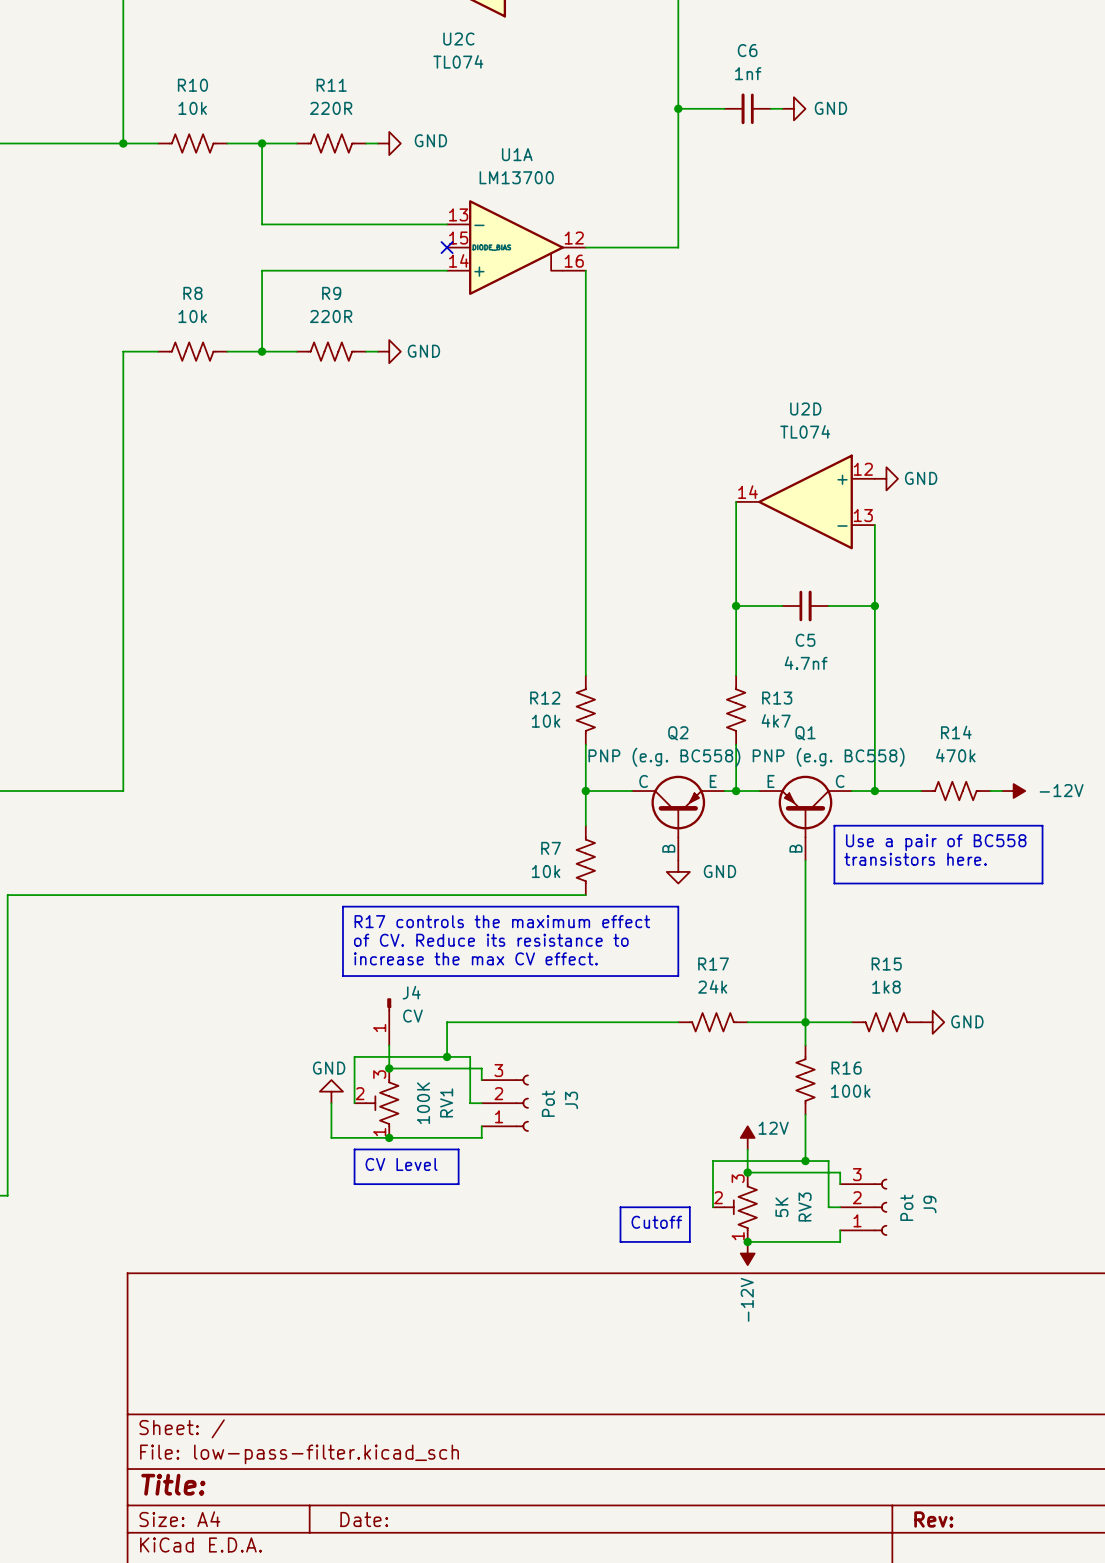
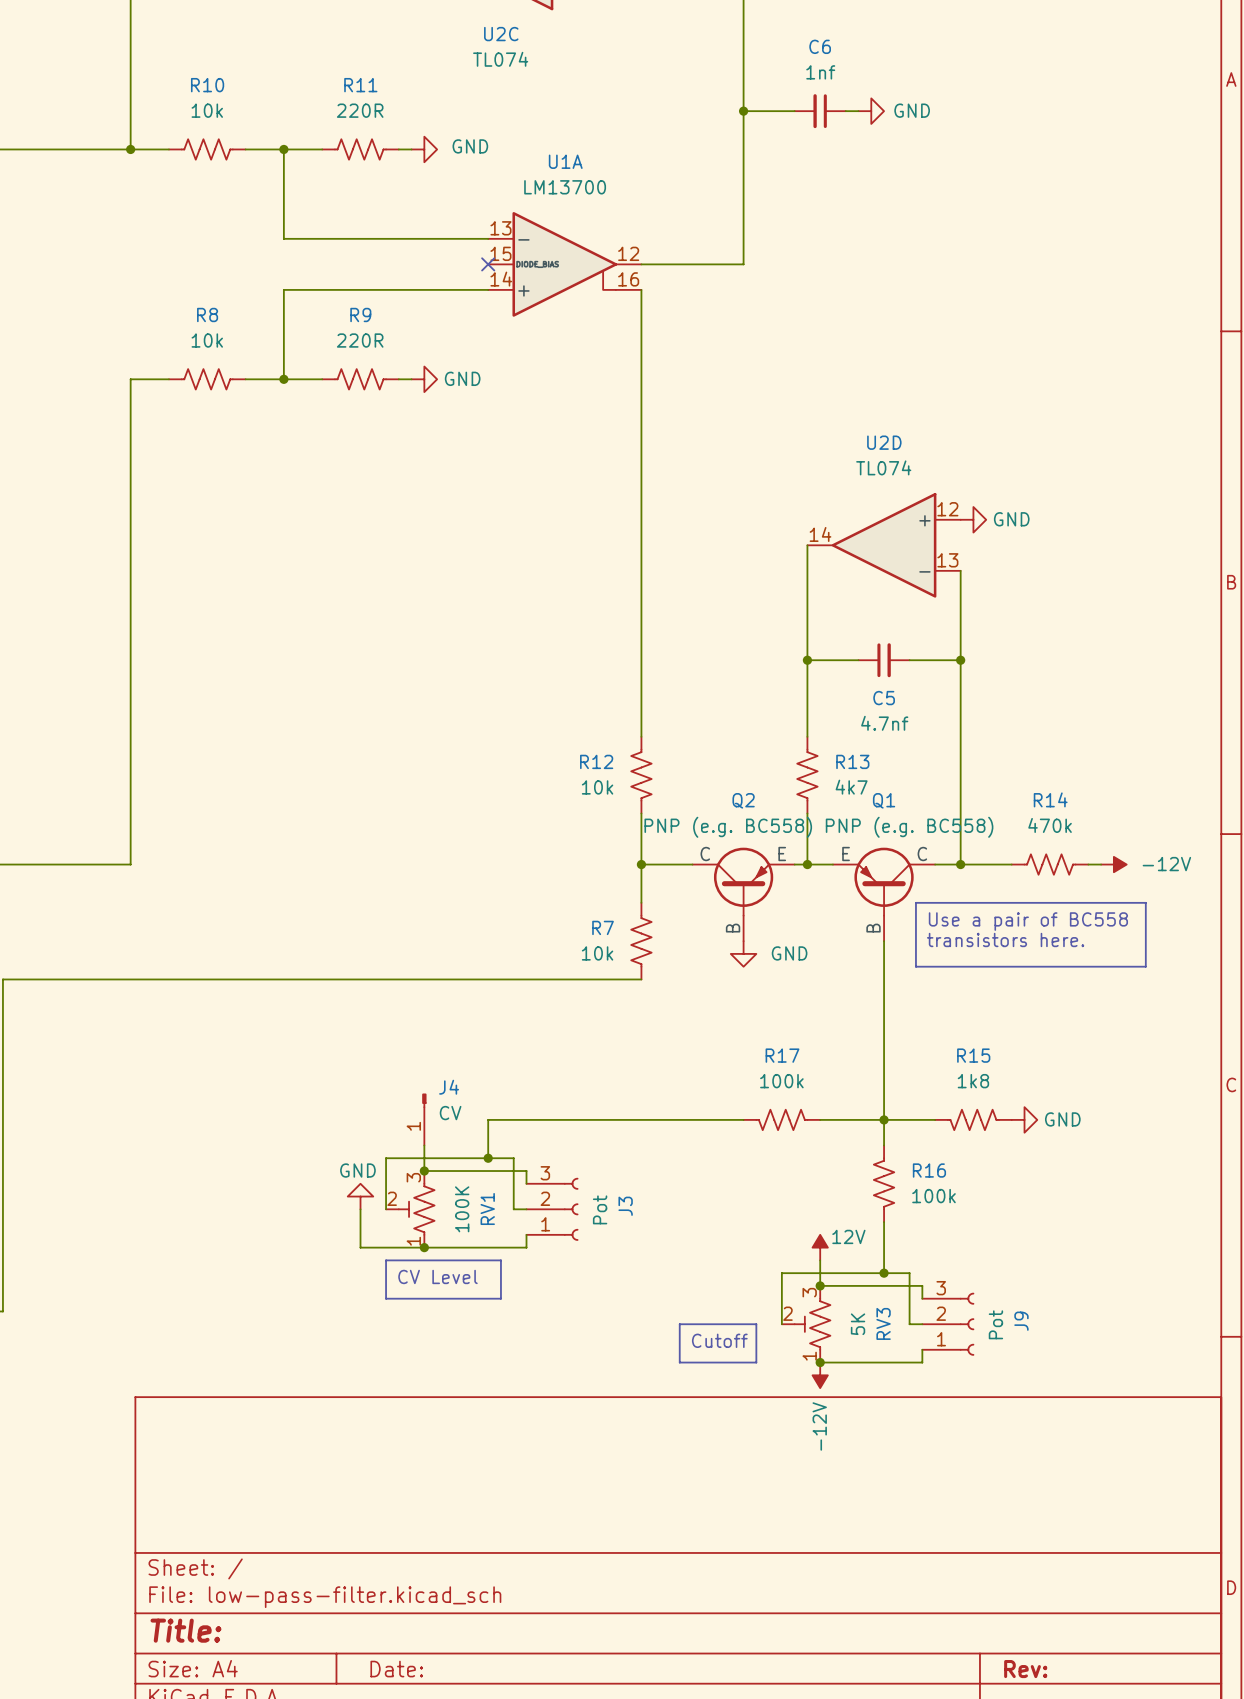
line: (342, 906) (678, 906) (678, 976) (342, 976) (342, 906) -> none
text: R17 controls the maximum effect (502, 921) -> none
text: of CV. Reduce its resistance to (491, 940) -> none
text: increase the max CV effect. (475, 958) -> none
R17 value: 24k (712, 986) -> 100k (781, 1081)

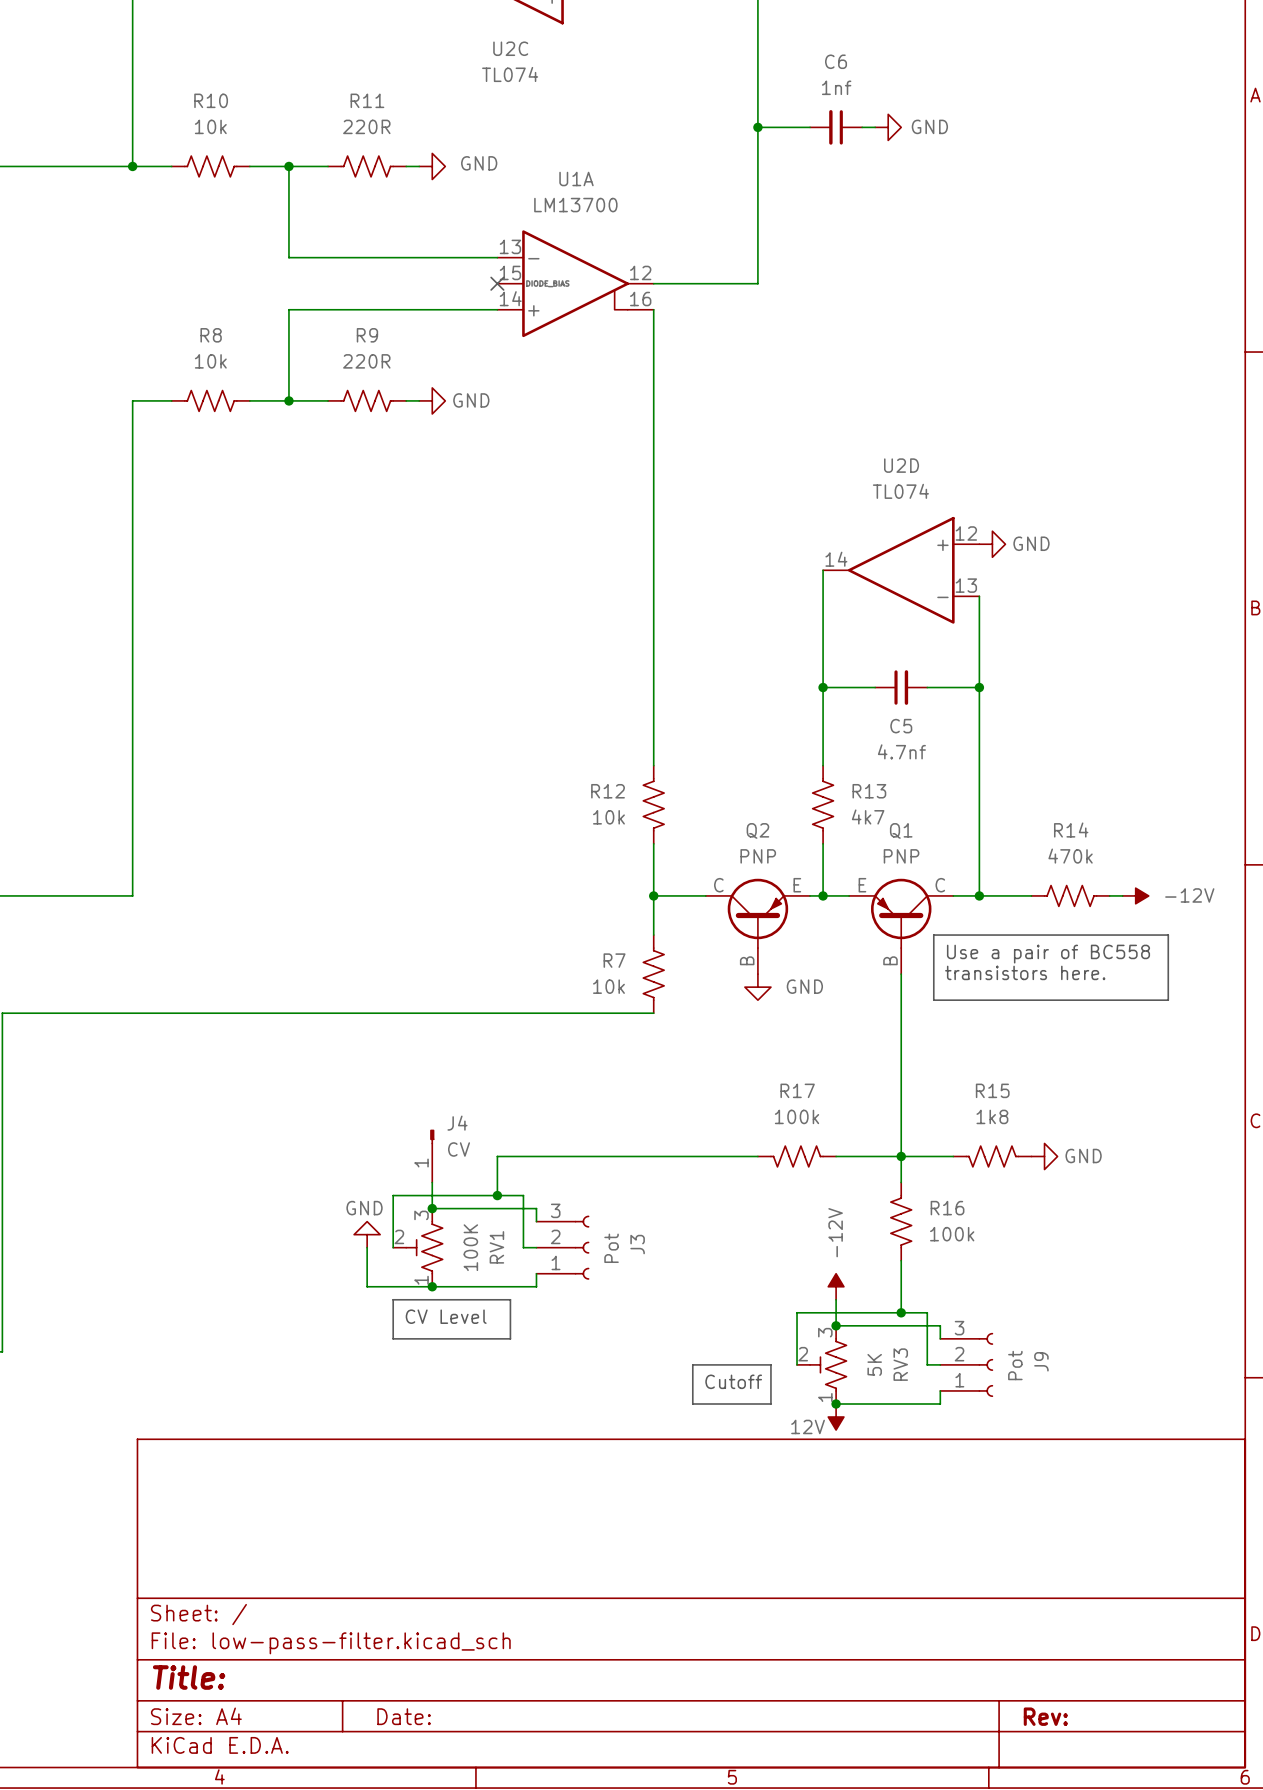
Q2 value: PNP (e.g. BC558) (728, 827) -> PNP (758, 856)
Q1 value: PNP (e.g. BC558) (909, 827) -> PNP (901, 856)
power symbol: 12V (820, 1247) -> -12V (836, 1286)
power symbol: -12V (820, 1375) -> 12V (836, 1417)

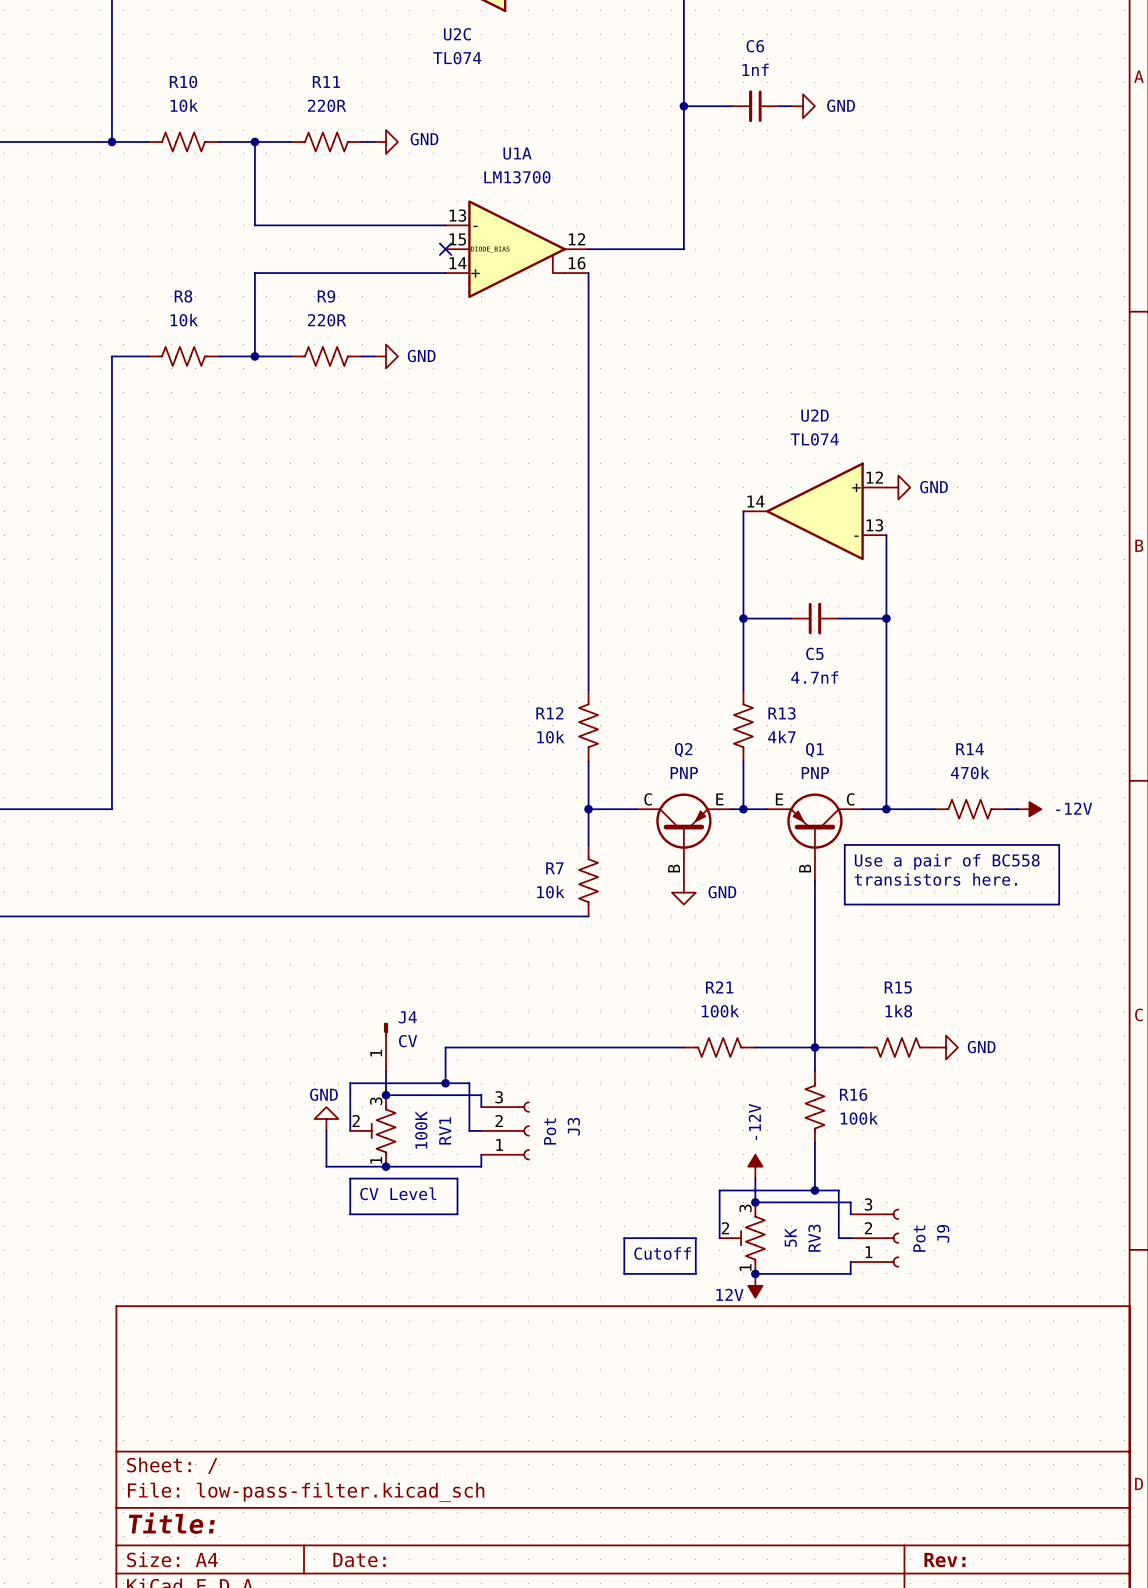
R17 name: R17 (797, 1090) -> R21 (719, 987)

